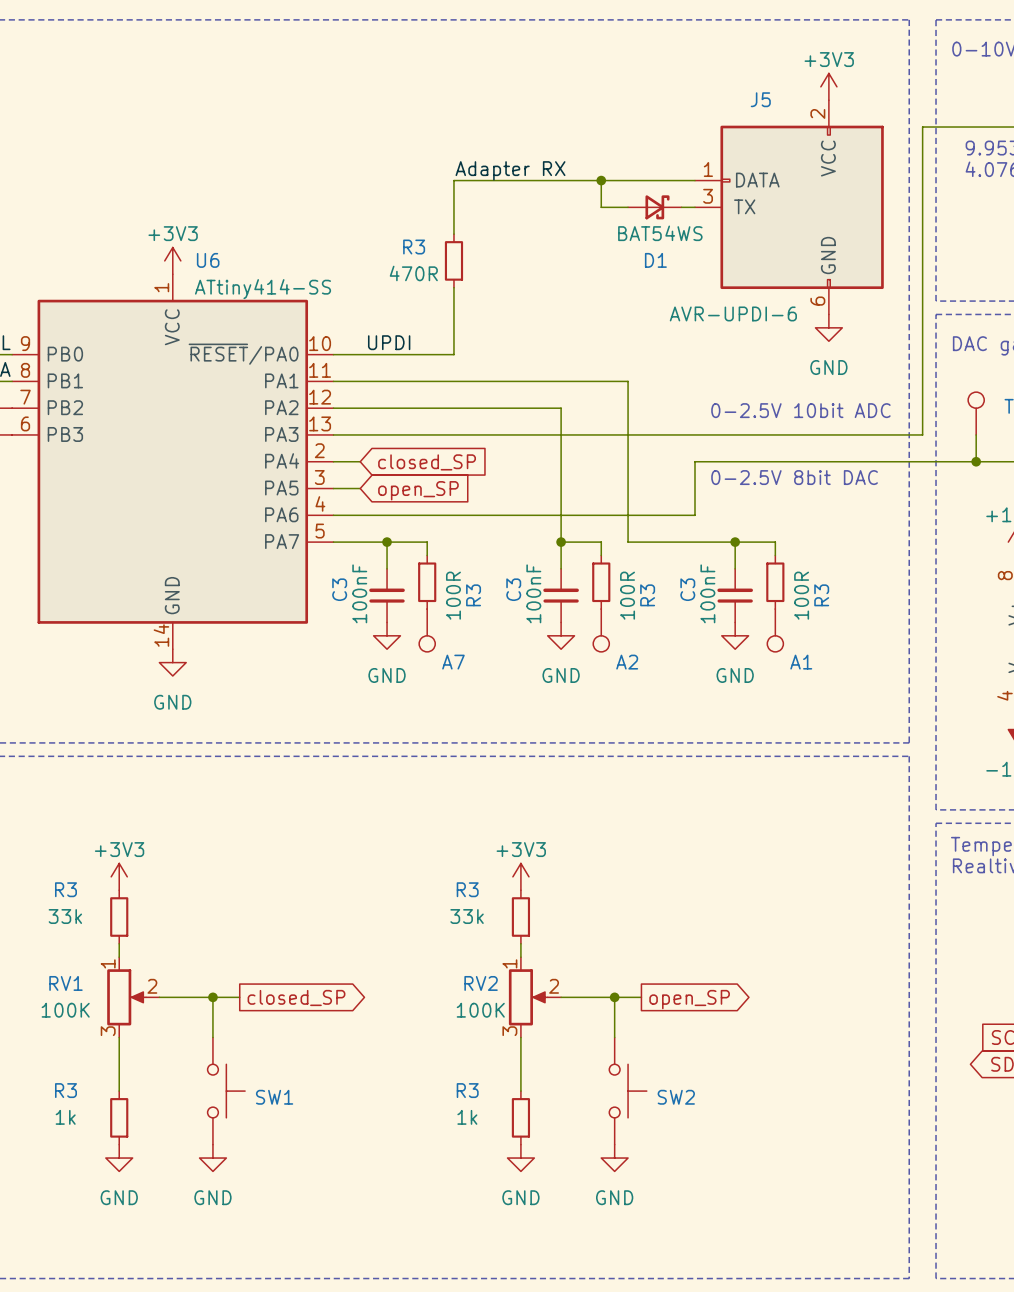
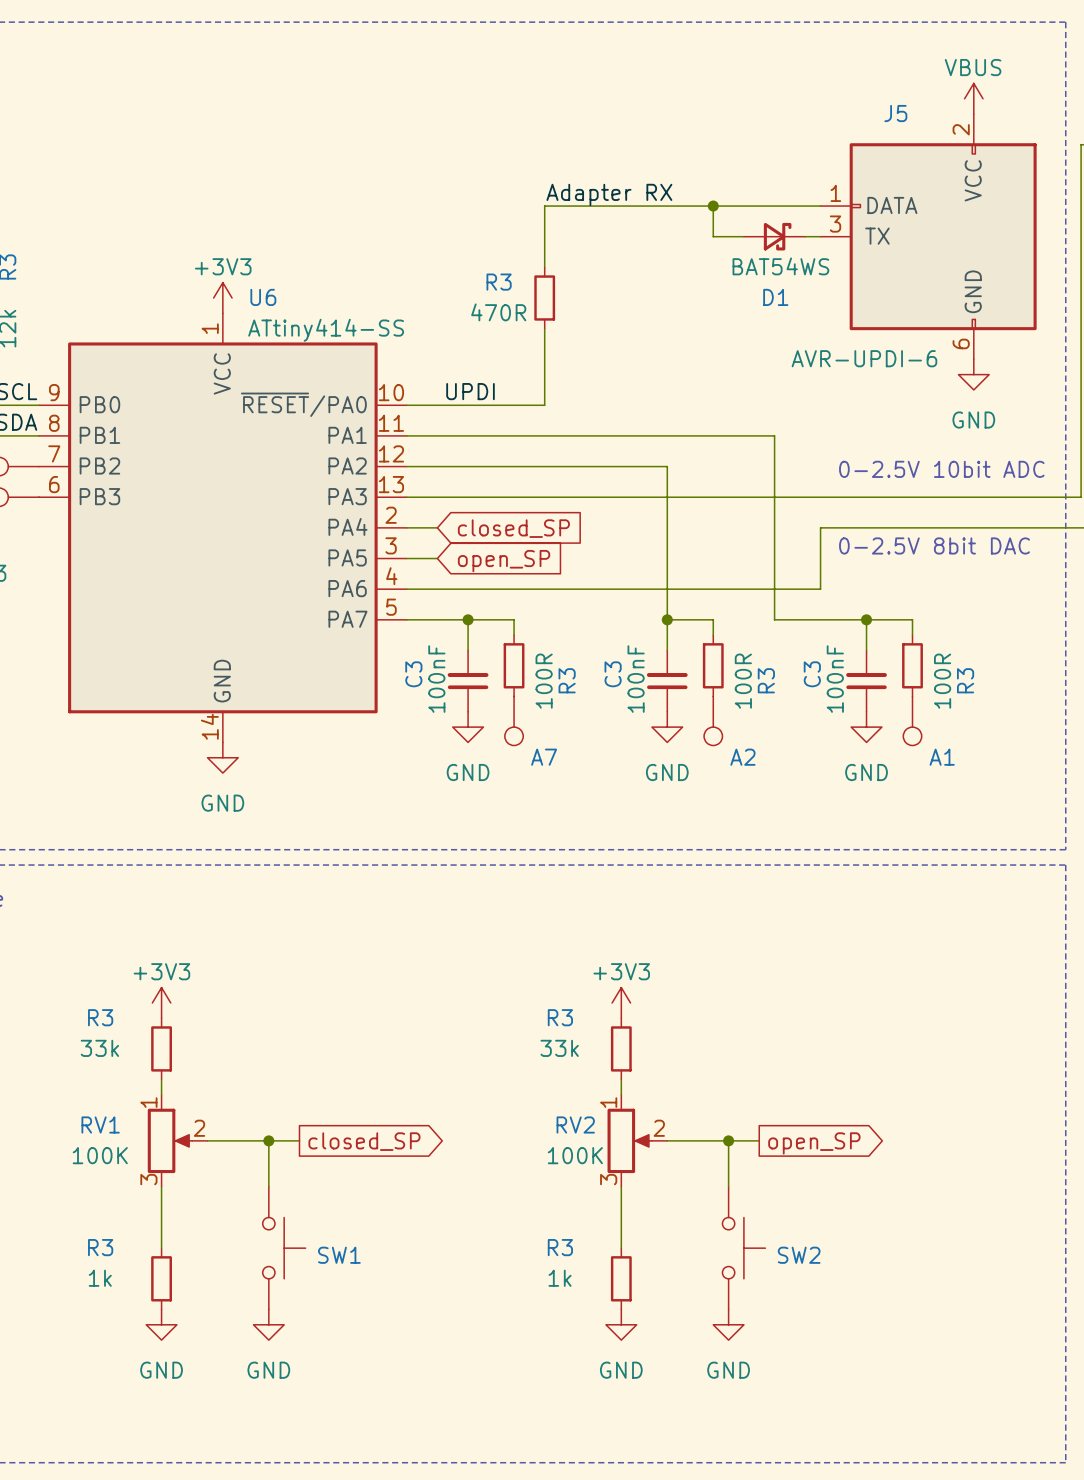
power symbol: +3V3 (828, 86) -> VBUS (973, 98)
wire: (628, 381) (628, 542) (654, 542) -> (743, 435) (774, 435) (774, 619)

